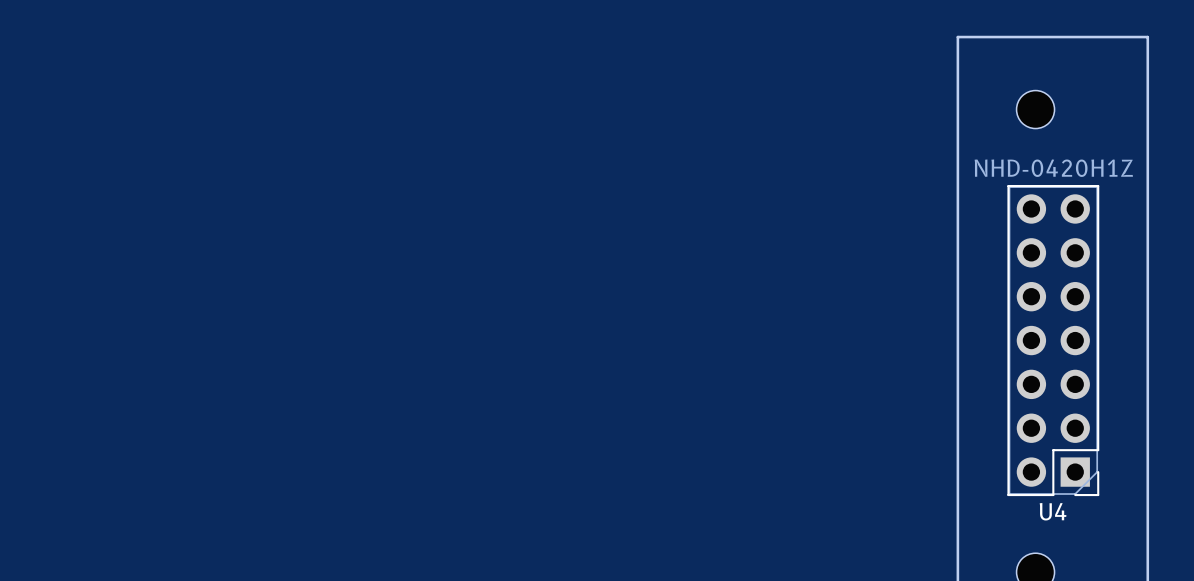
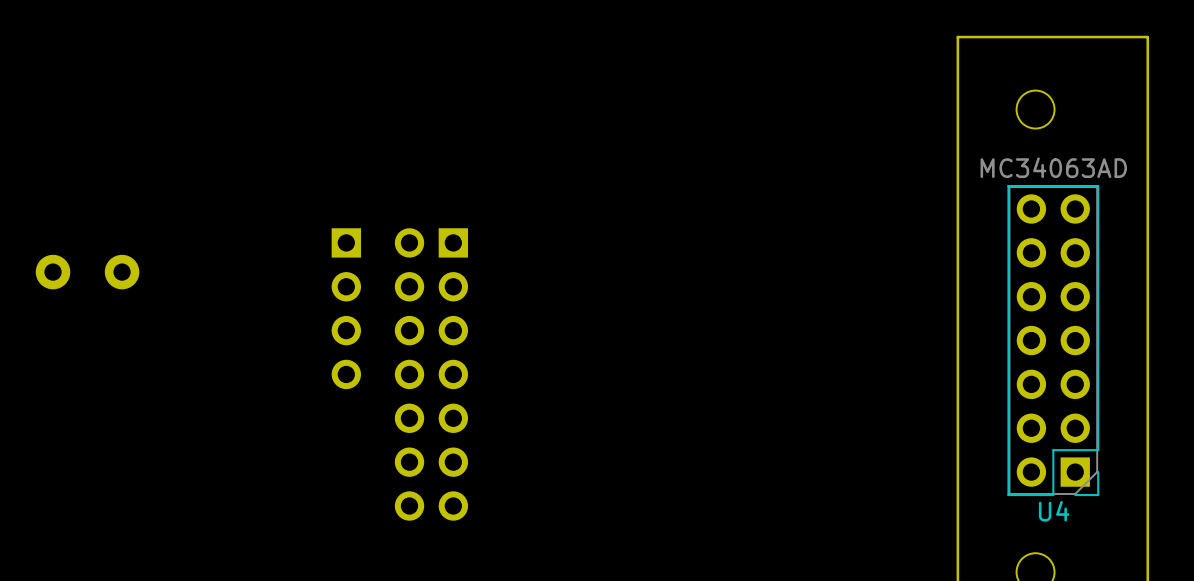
U4 value: NHD-0420H1Z (1053, 168) -> MC34063AD (1053, 167)
part: none -> (87, 272)
part: none -> (346, 308)
part: none -> (431, 374)

